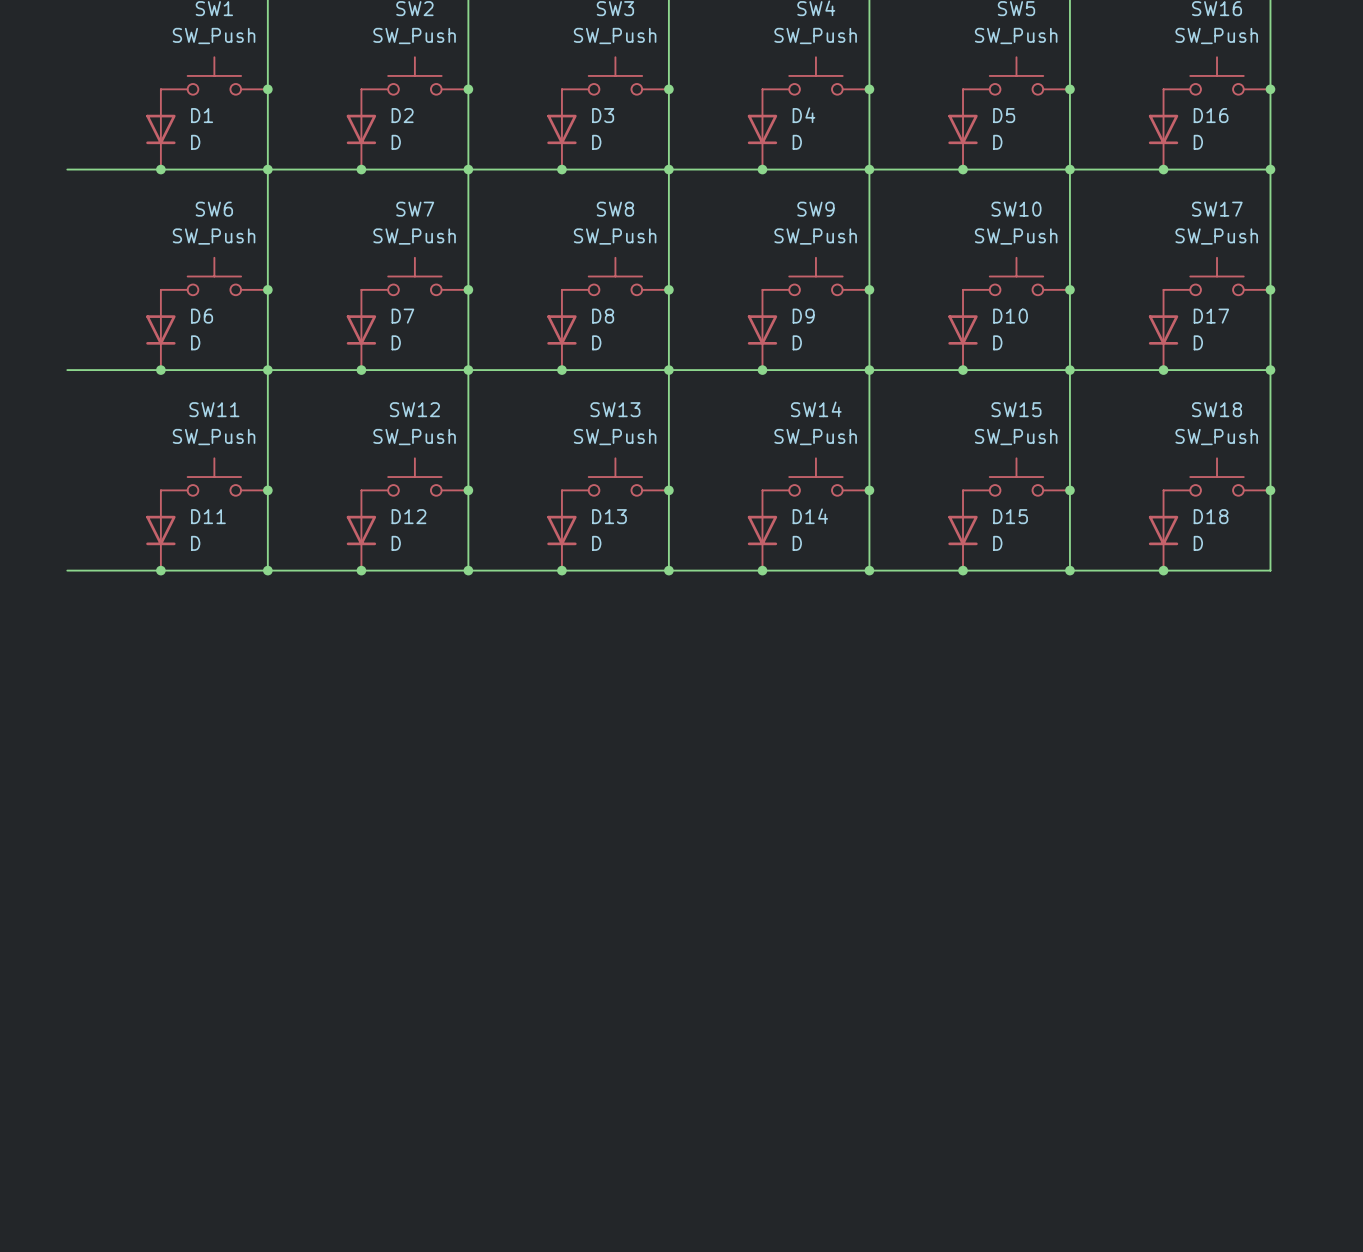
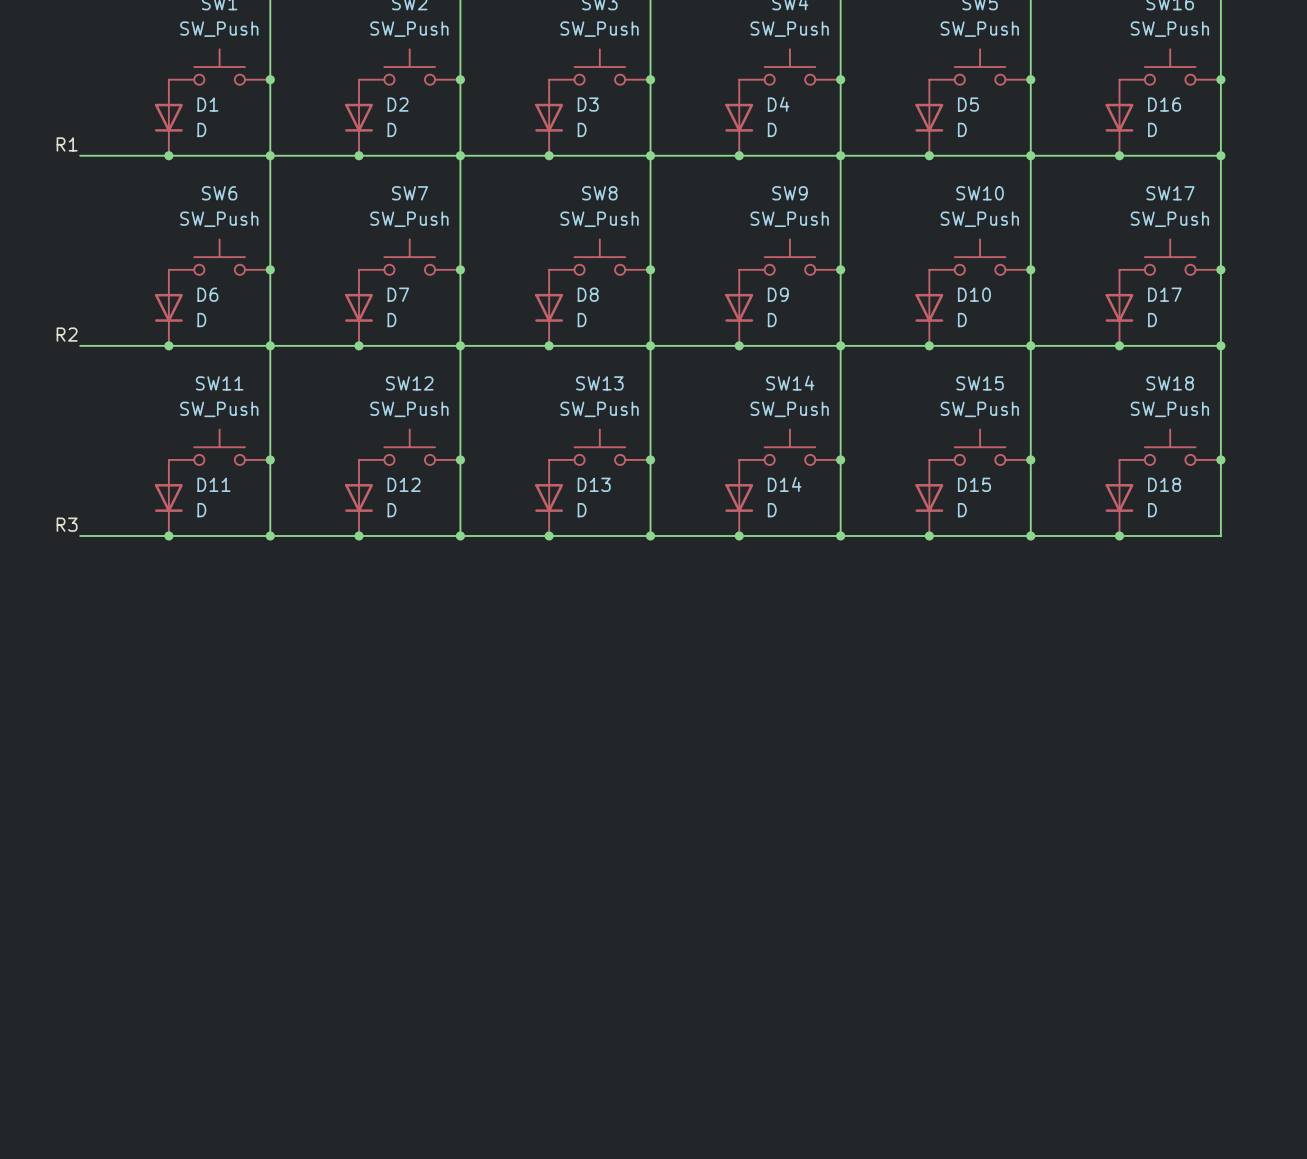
label: none -> R1 (67, 144)
label: none -> R2 (67, 334)
label: none -> R3 (67, 524)

